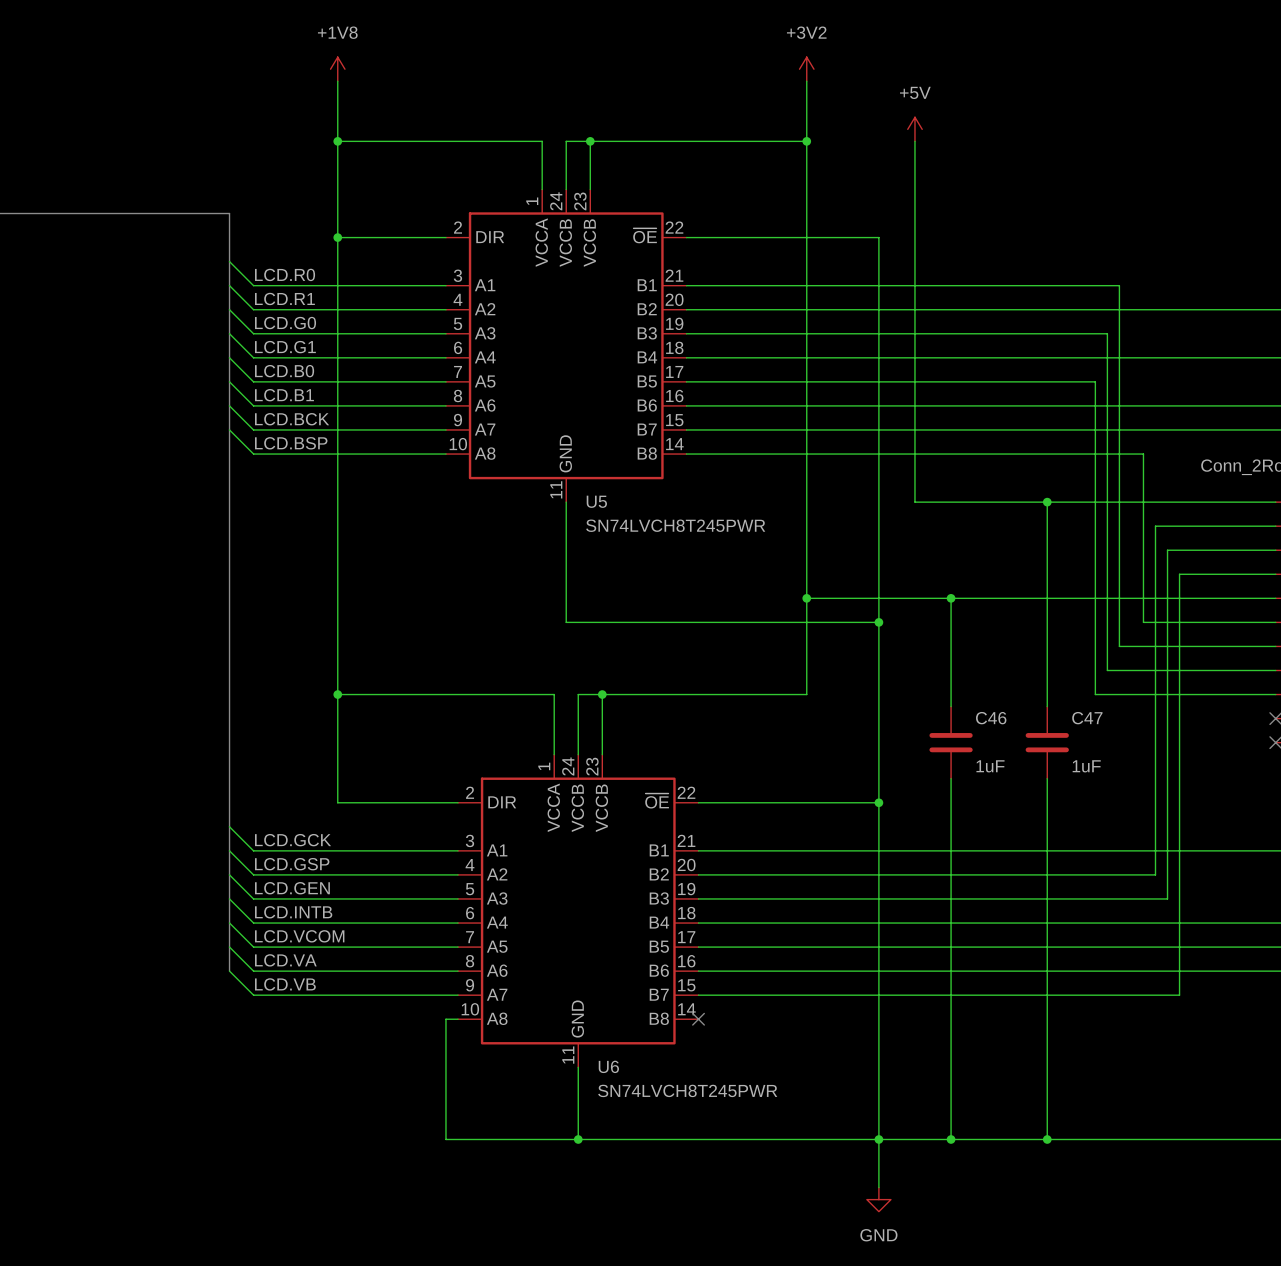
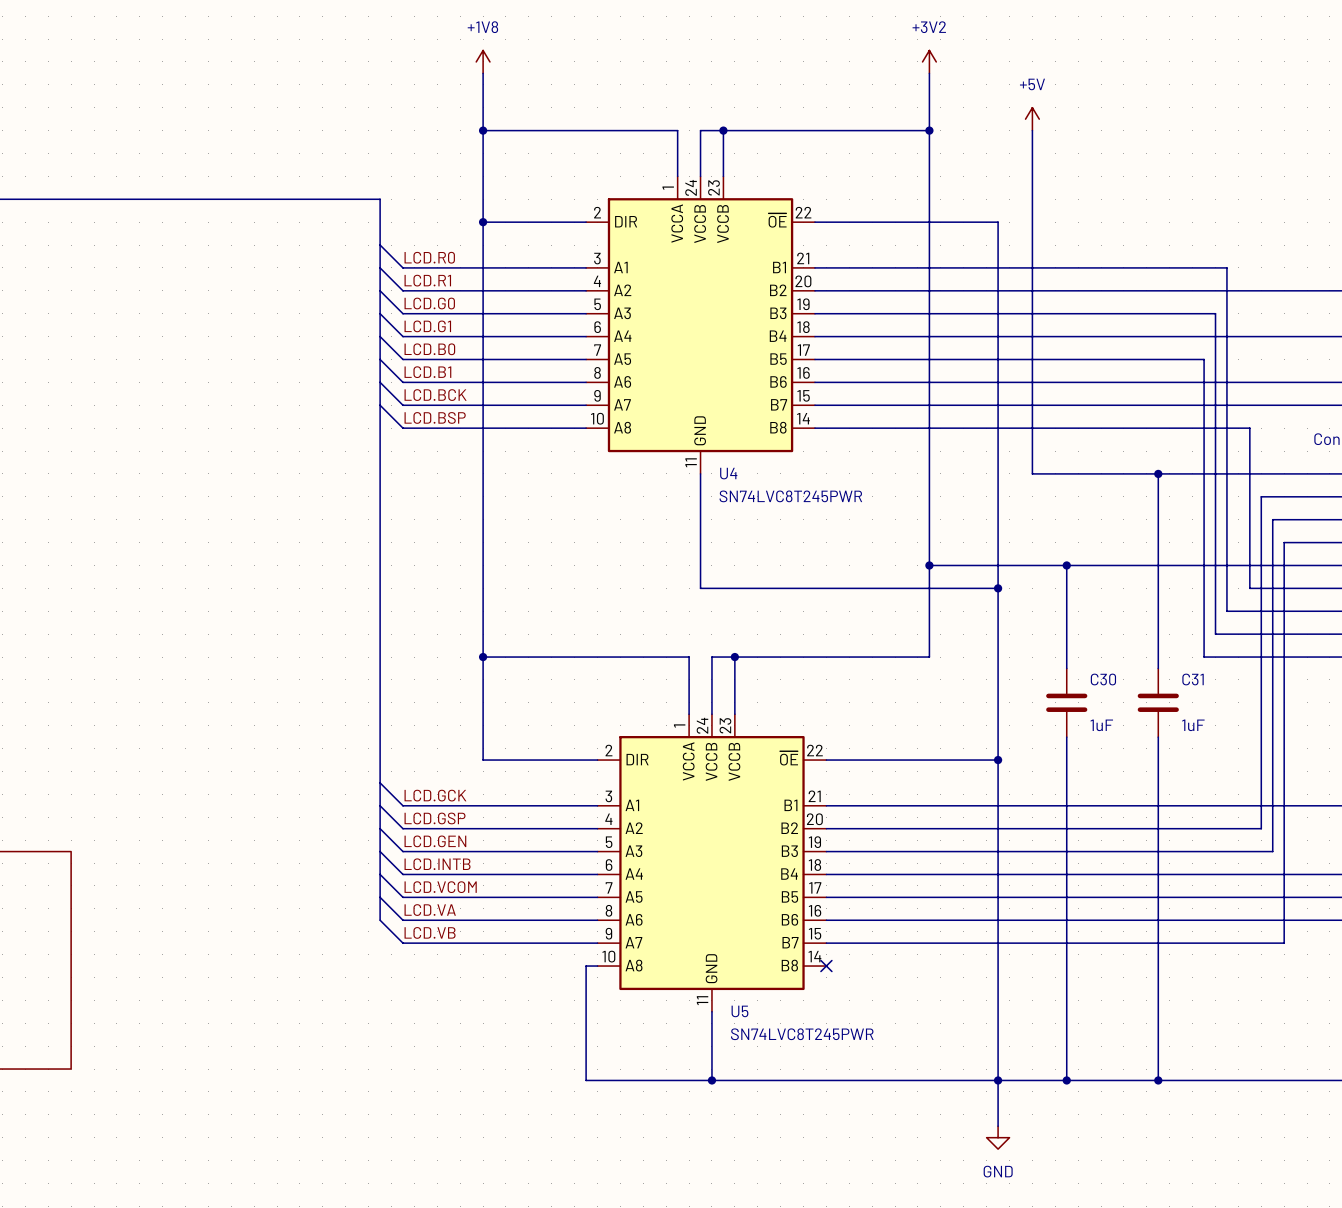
U5 name: U5 (596, 501) -> U4 (728, 473)
U5 value: SN74LVCH8T245PWR (675, 525) -> SN74LVC8T245PWR (790, 496)
C46 name: C46 (991, 718) -> C30 (1103, 679)
C47 name: C47 (1087, 718) -> C31 (1193, 679)
U6 name: U6 (608, 1066) -> U5 (739, 1011)
U6 value: SN74LVCH8T245PWR (687, 1090) -> SN74LVC8T245PWR (802, 1034)

